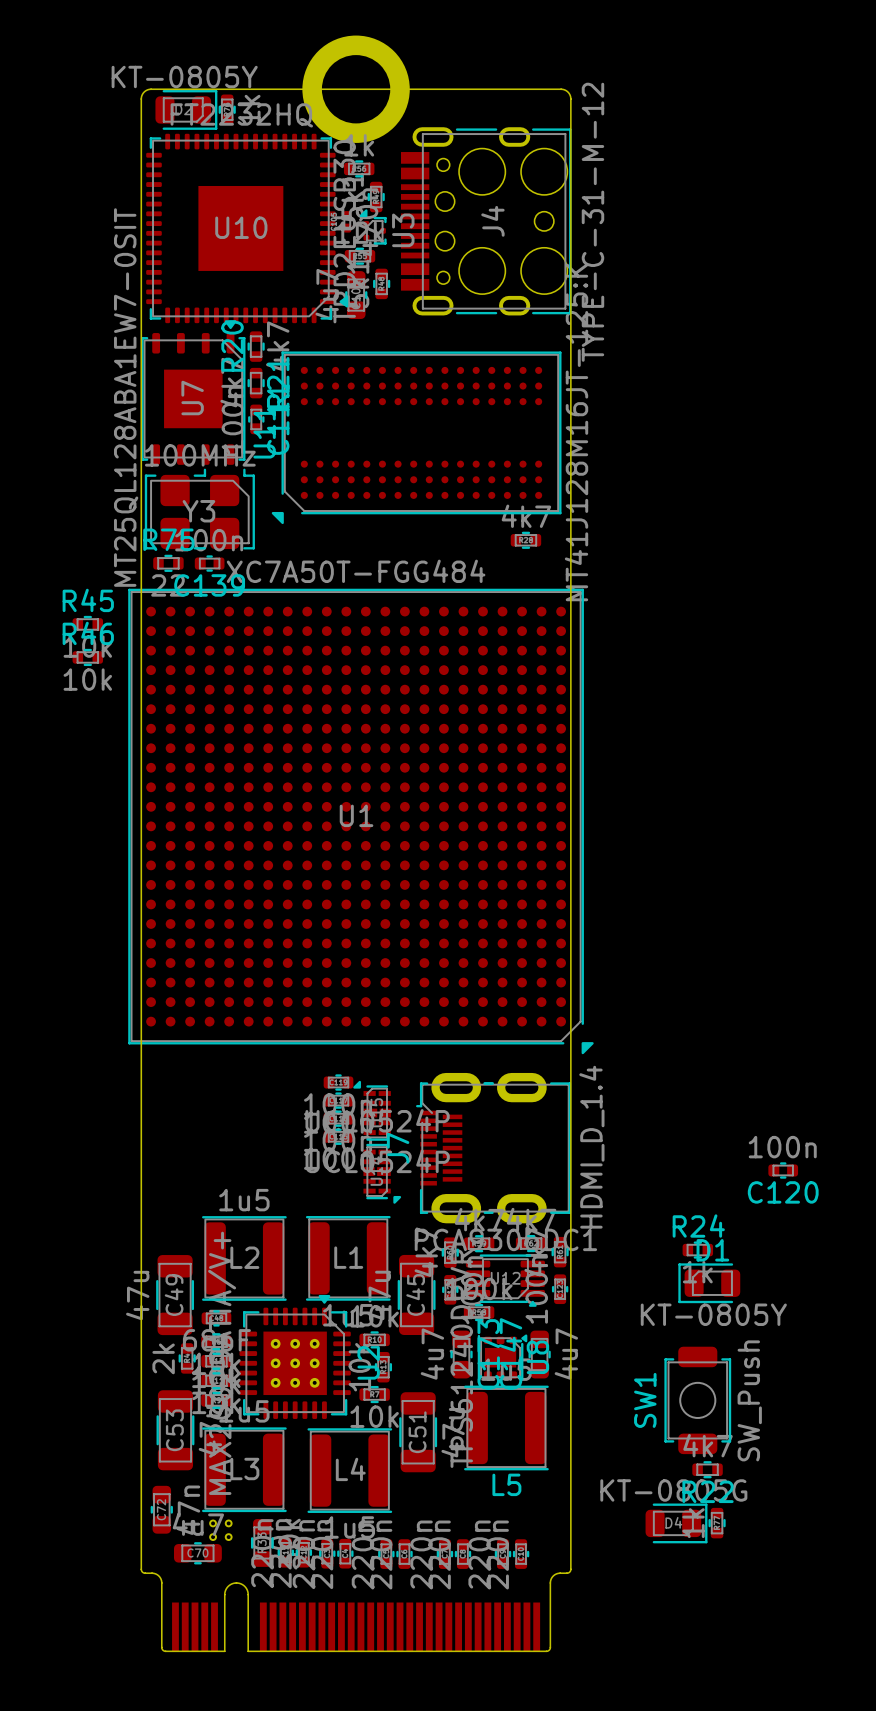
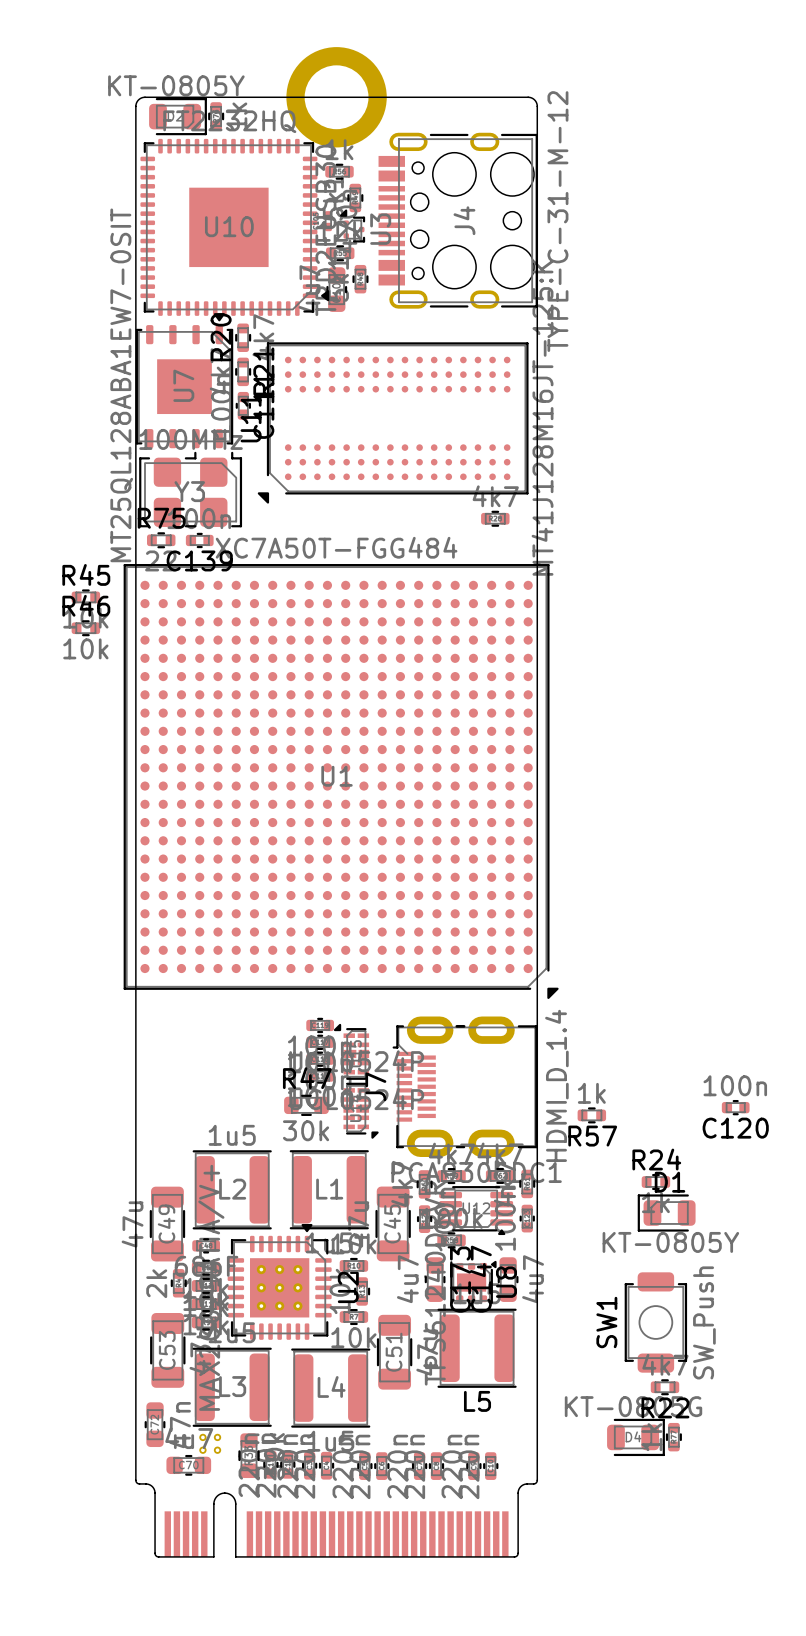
R47: none -> 30k (306, 1105)
R57: none -> 1k (591, 1115)

